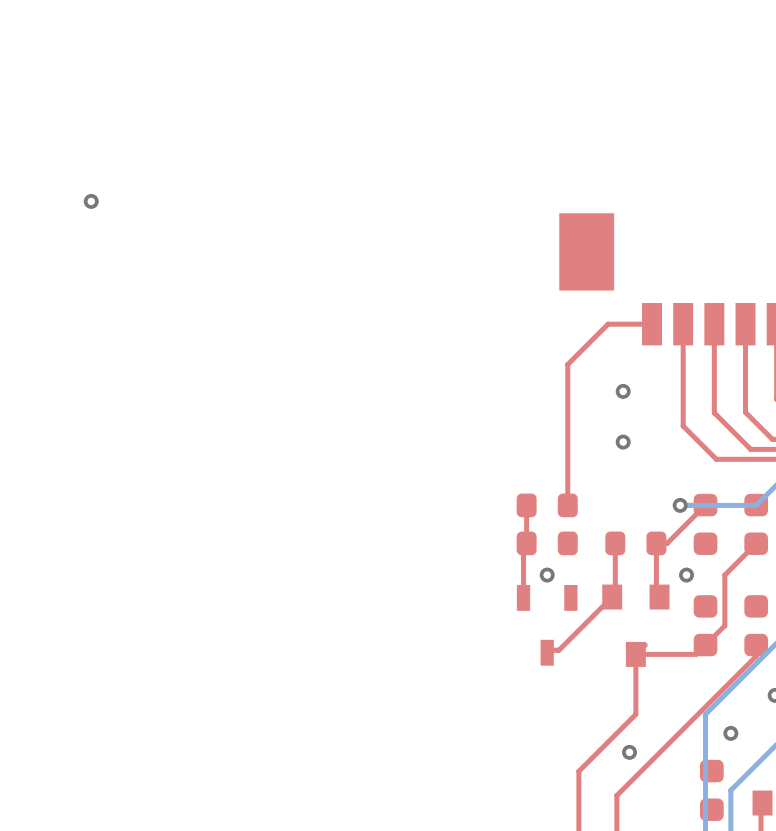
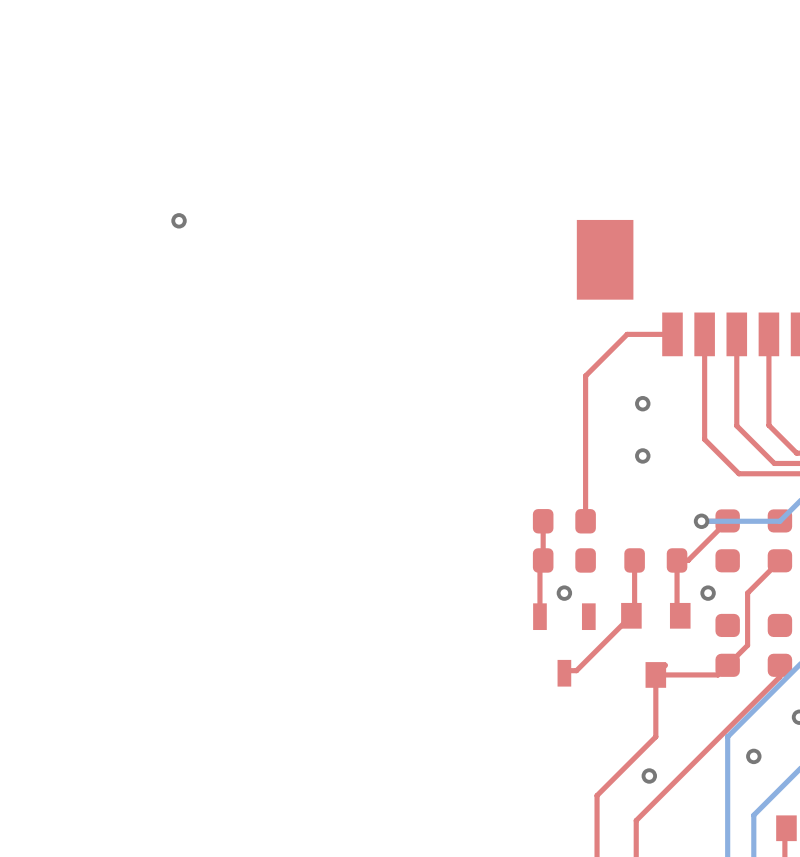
via position: (91, 201) -> (179, 220)
part: (711, 790) -> none

